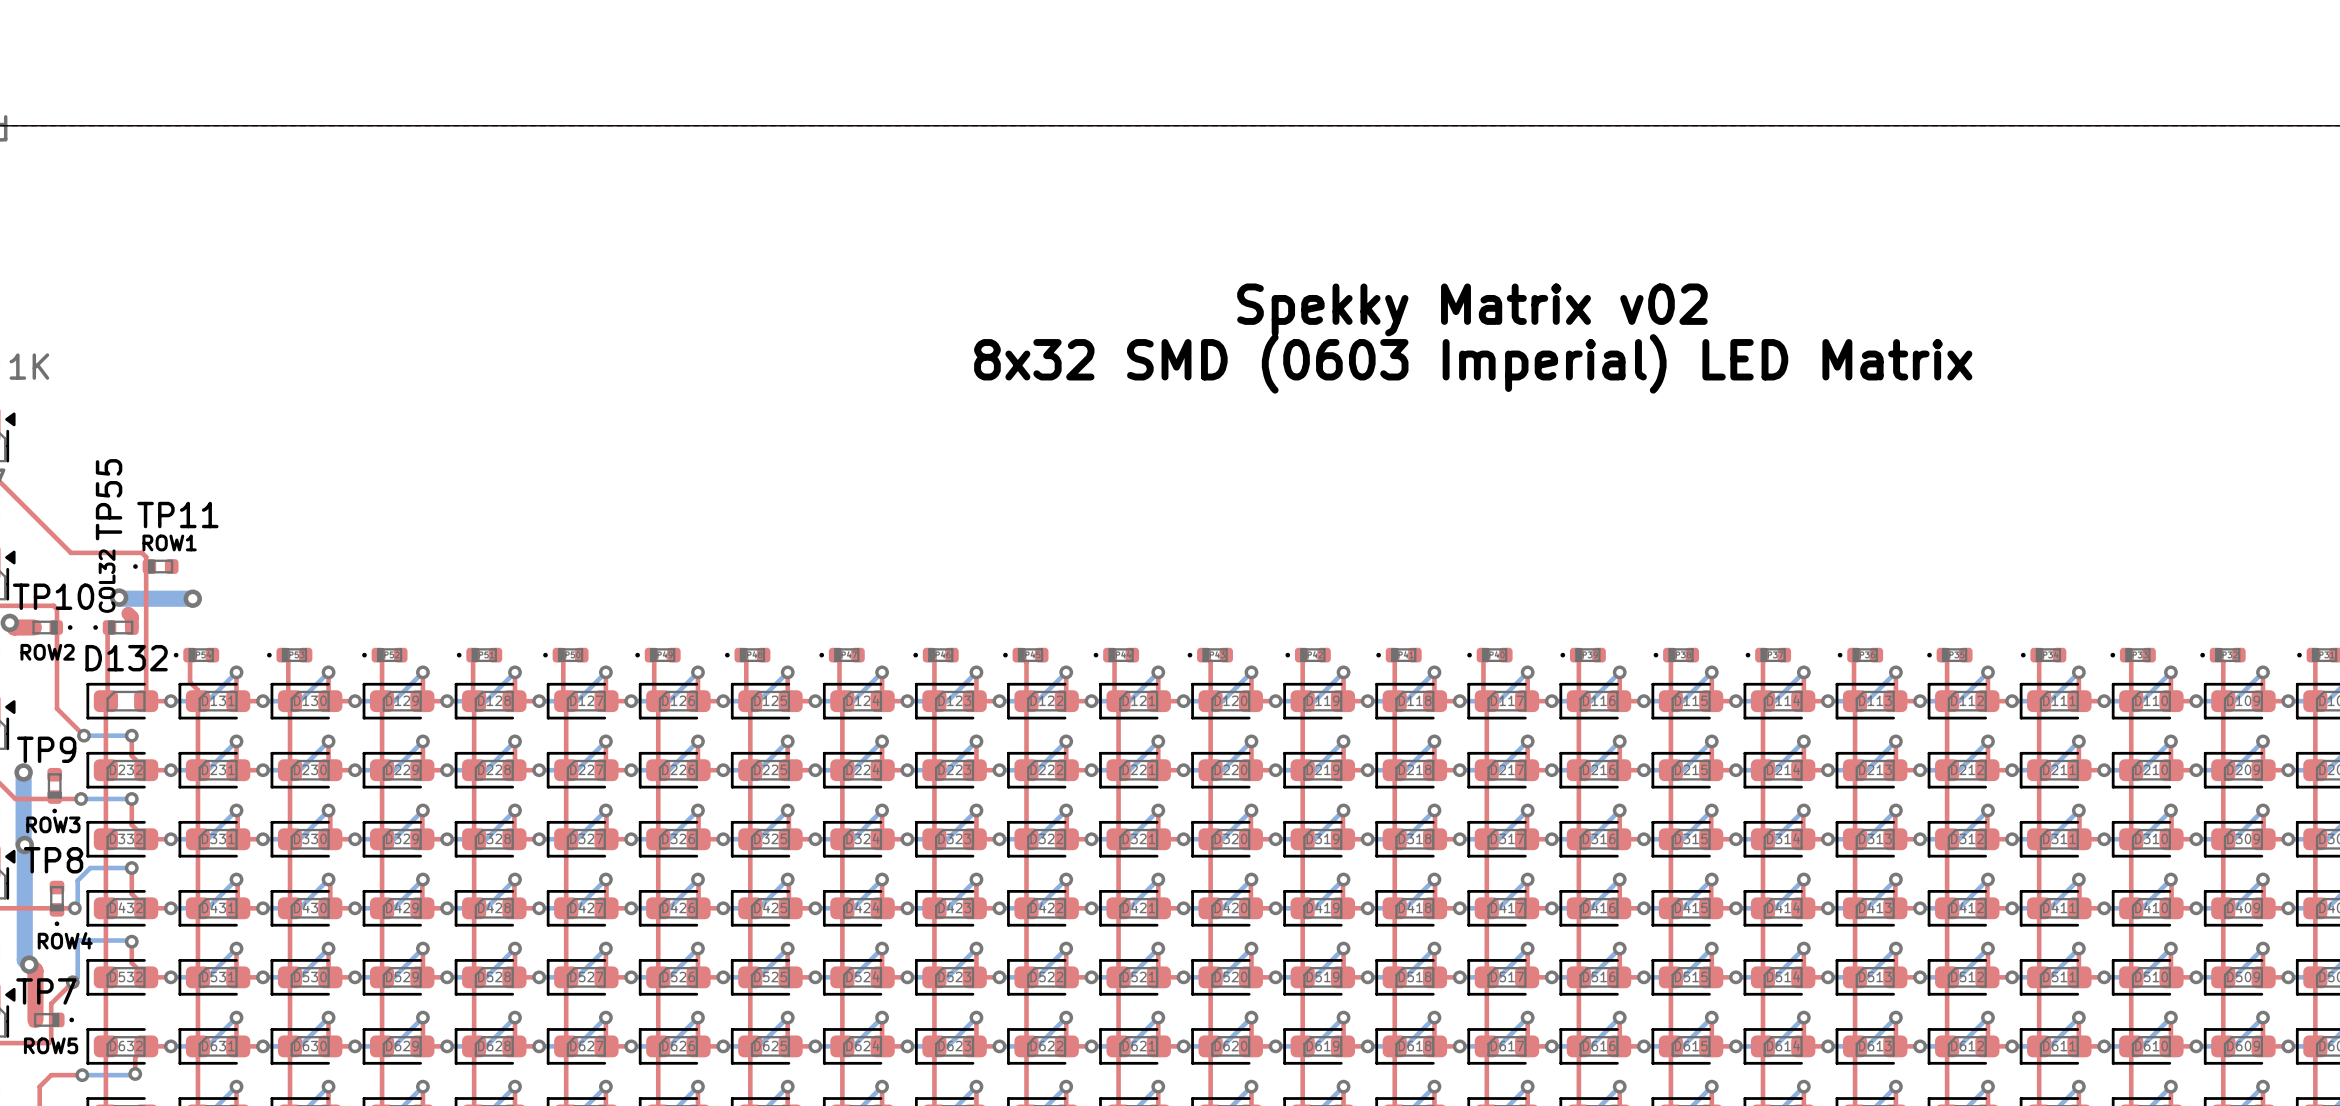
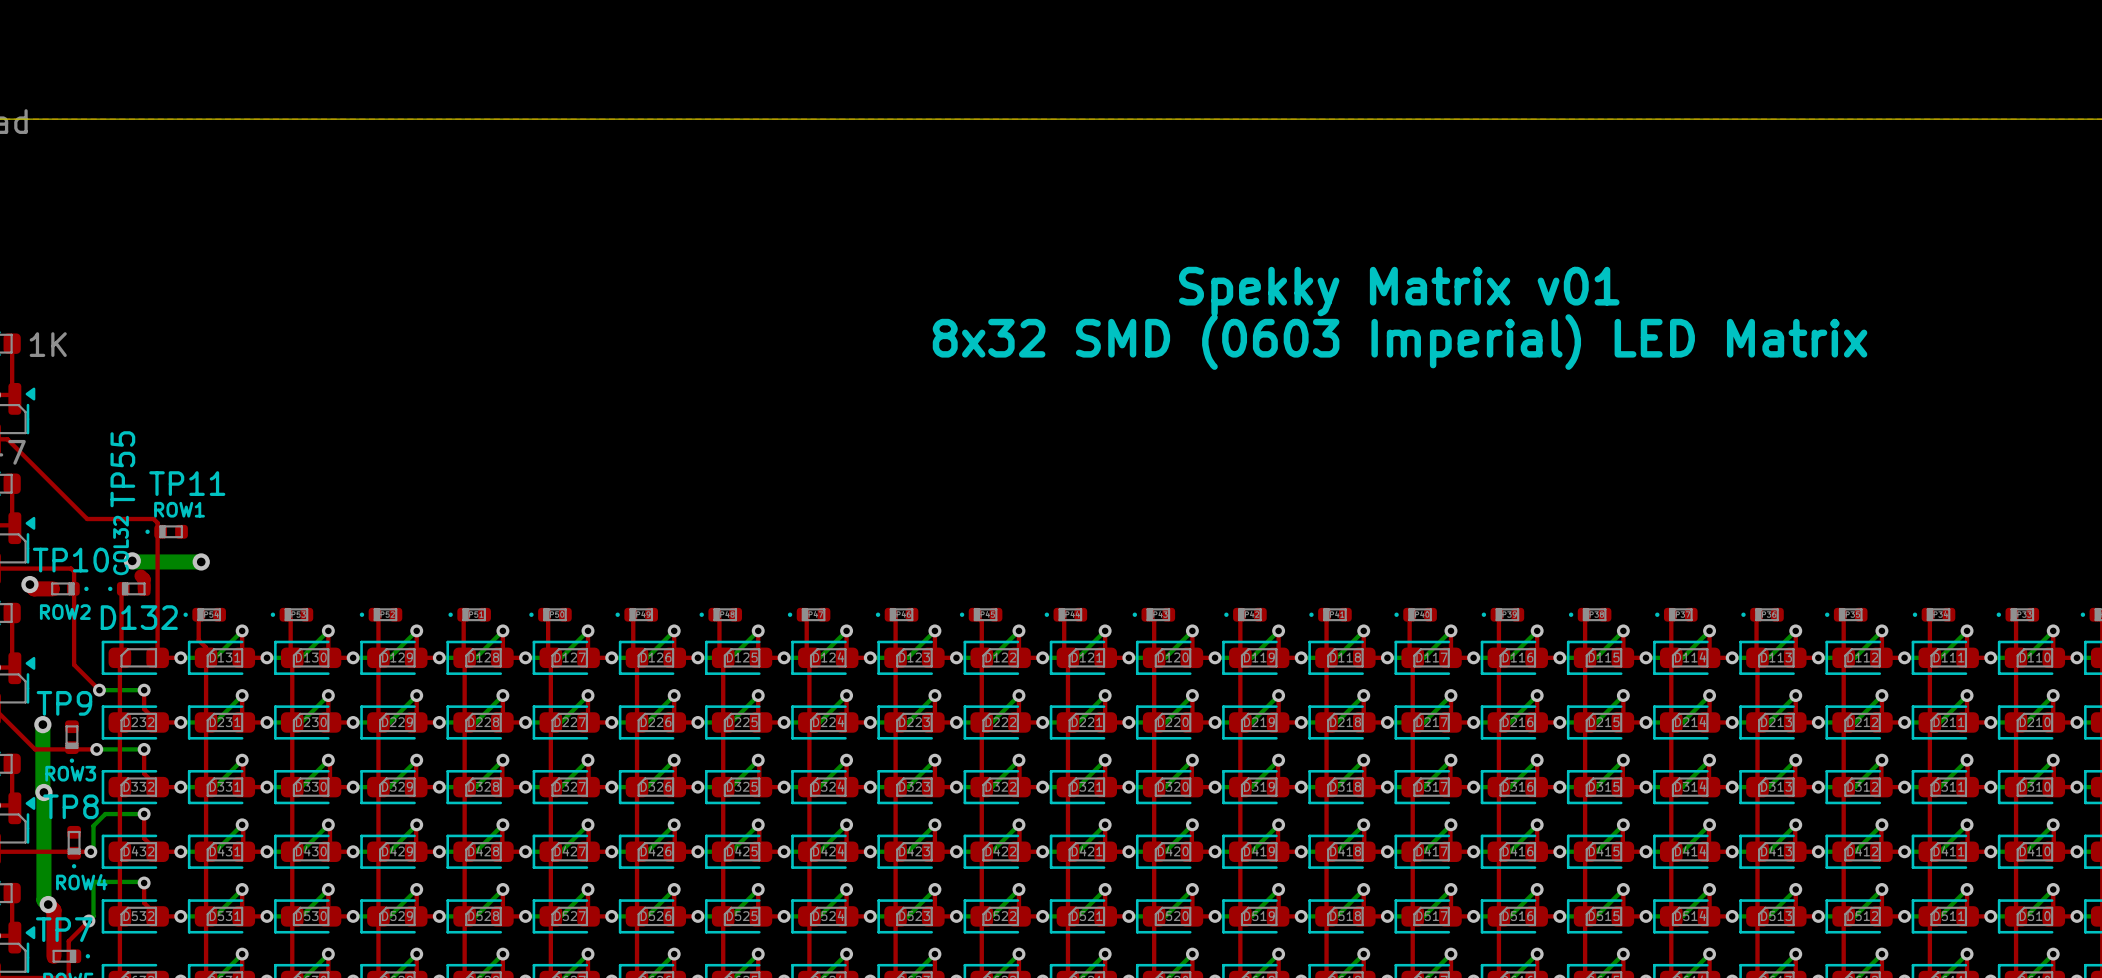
text: Spekky Matrix v02 (1472, 309) -> Spekky Matrix v01 (1399, 291)

